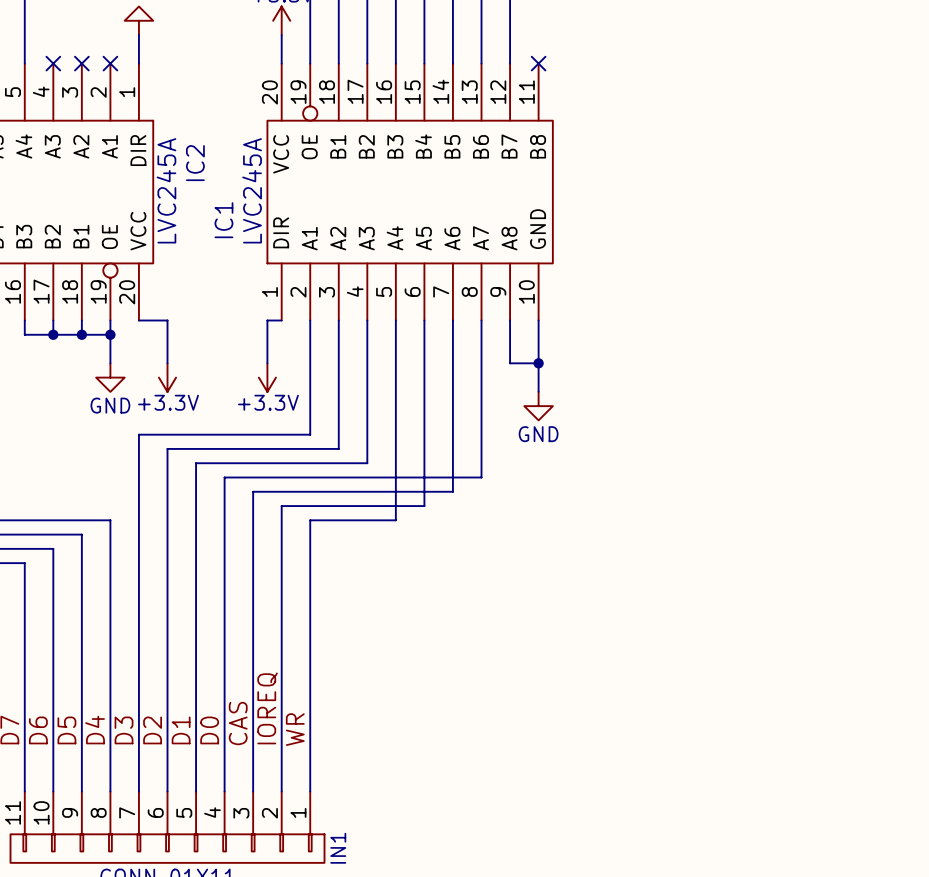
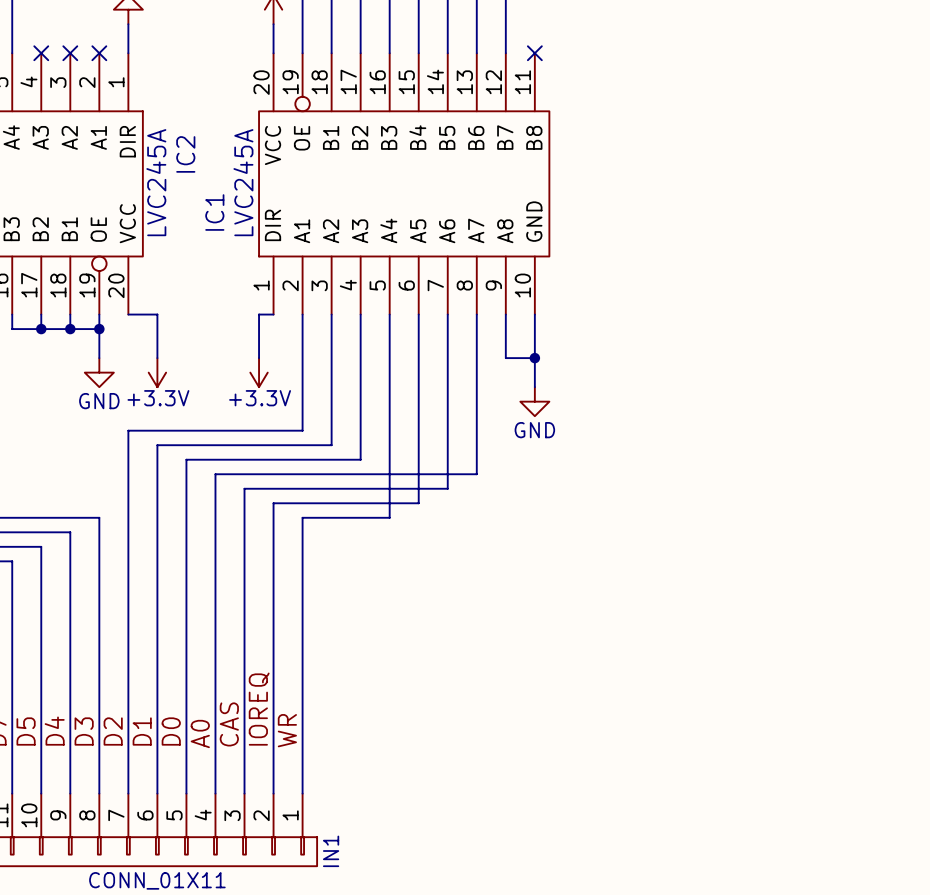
label: D6 (38, 730) -> D5 (26, 731)
label: D5 (66, 730) -> D4 (54, 731)
label: D4 (95, 730) -> D3 (84, 731)
label: D3 (124, 730) -> D2 (113, 731)
label: D2 (152, 730) -> D1 (142, 731)
label: D1 (181, 730) -> D0 (171, 731)
label: D0 (209, 730) -> A0 (200, 734)

